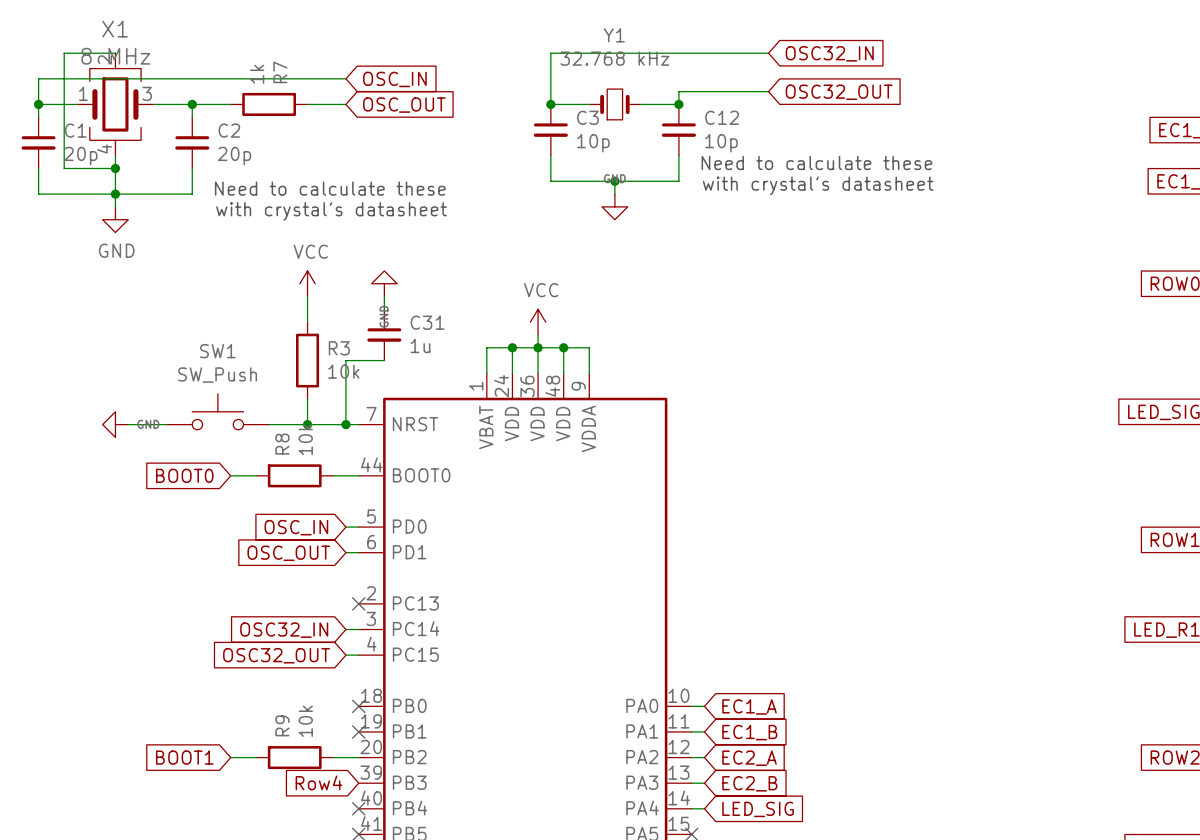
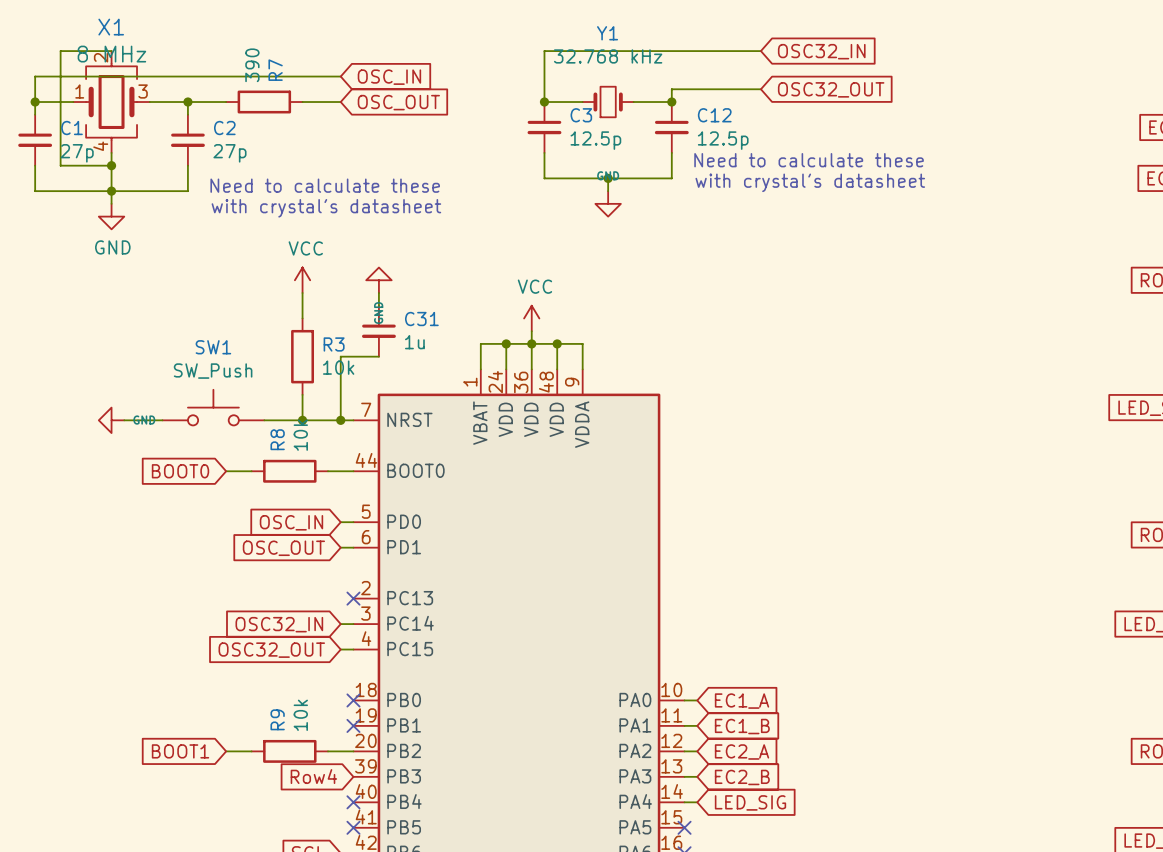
R7 value: 1k (257, 74) -> 390 (252, 65)
C3 value: 10p (593, 143) -> 12.5p (595, 140)
C12 value: 10p (721, 143) -> 12.5p (723, 140)
C1 value: 20p (80, 156) -> 27p (77, 153)
C2 value: 20p (234, 156) -> 27p (229, 153)

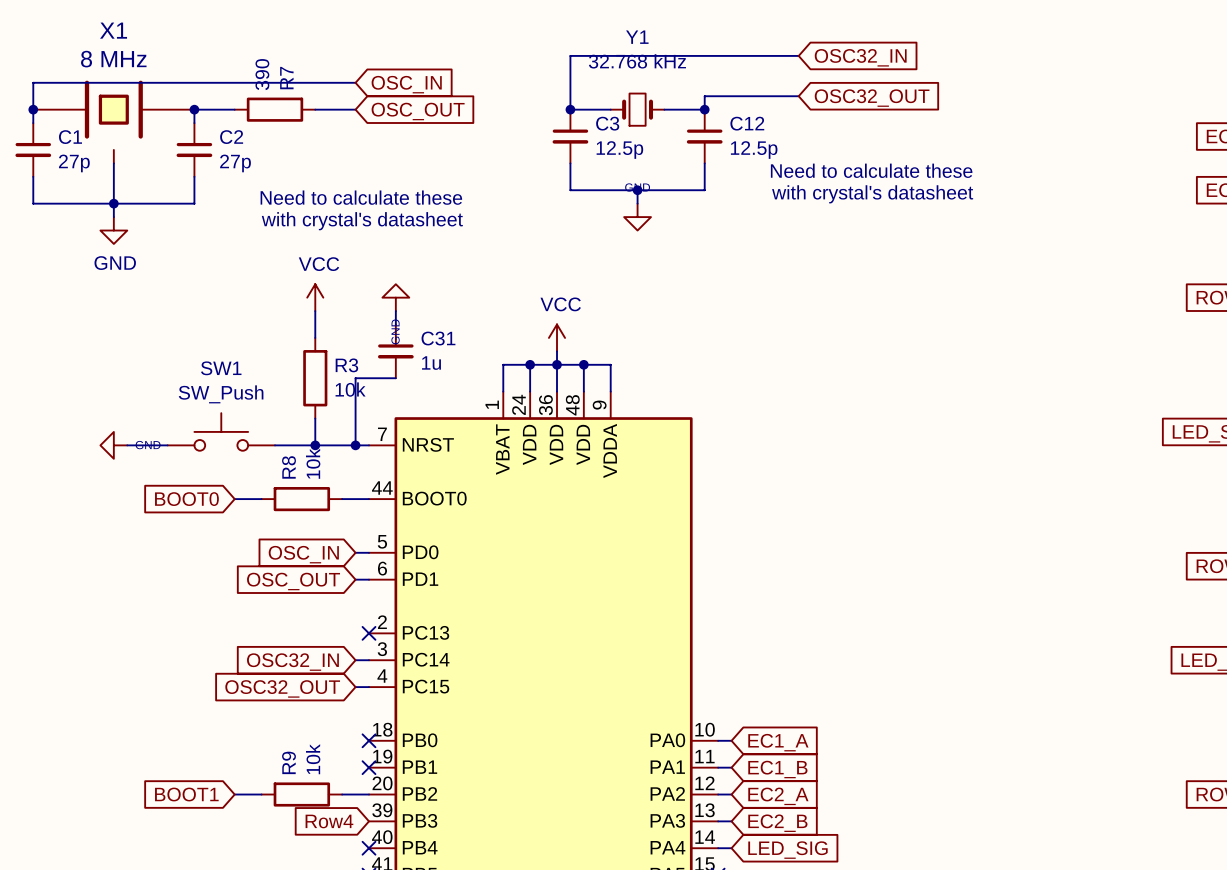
X1 symbol: [73, 51, 150, 153] -> [33, 80, 195, 164]
wire: (111, 51) (60, 51) (60, 165) (111, 165) -> none
junction: (111, 165) -> none

